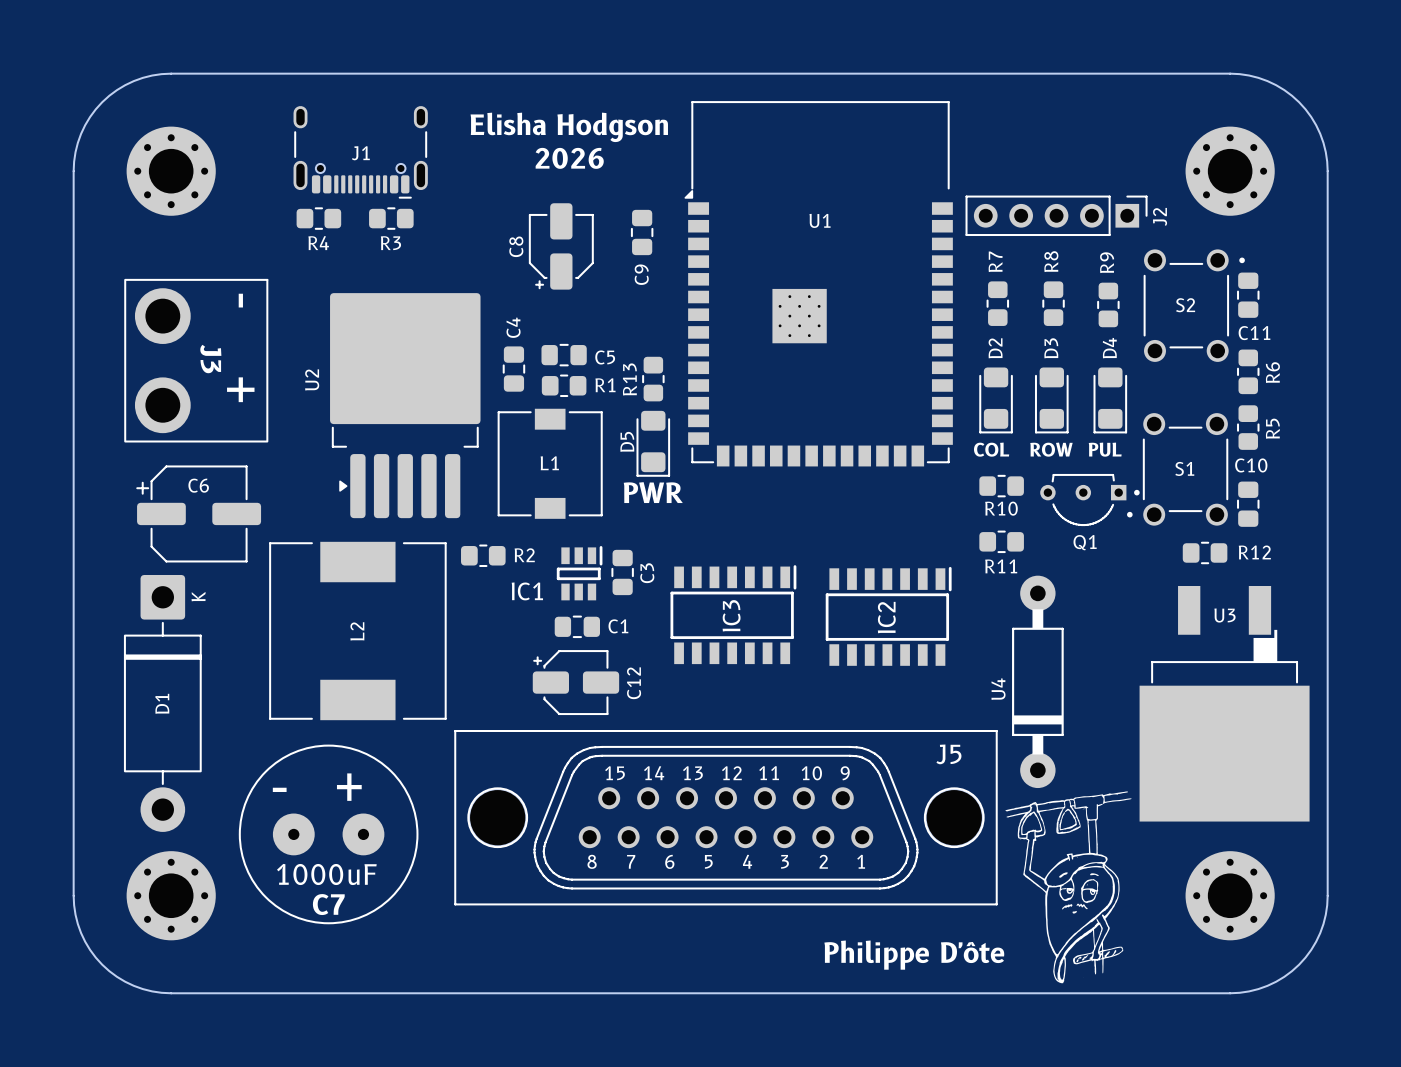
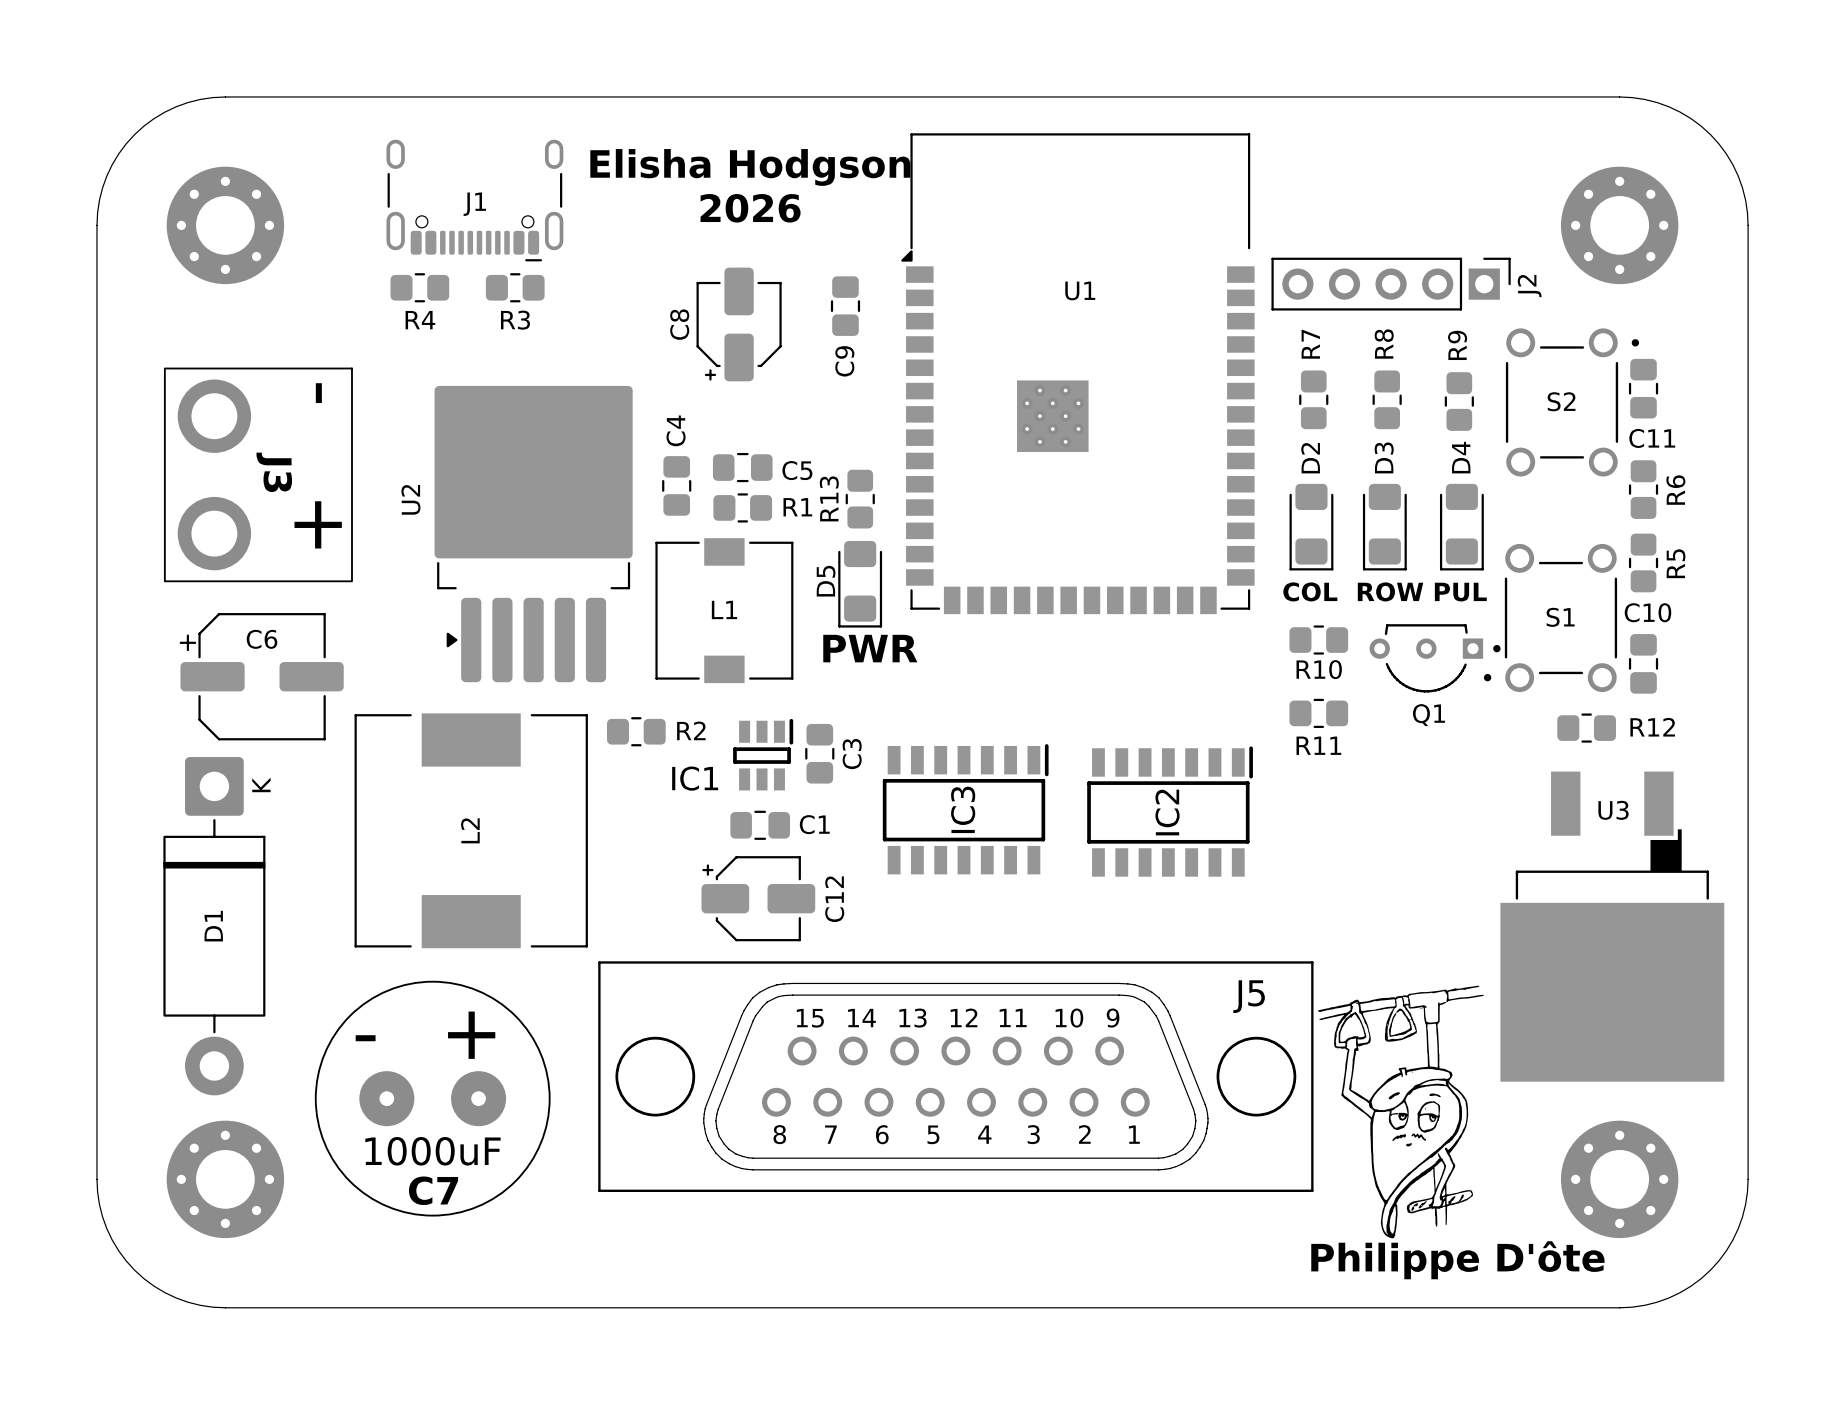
U4: (1037, 681) -> none
drawing position: (1068, 887) -> (1400, 1112)
text position: Philippe D'ôte (914, 955) -> Philippe D'ôte (1457, 1260)

